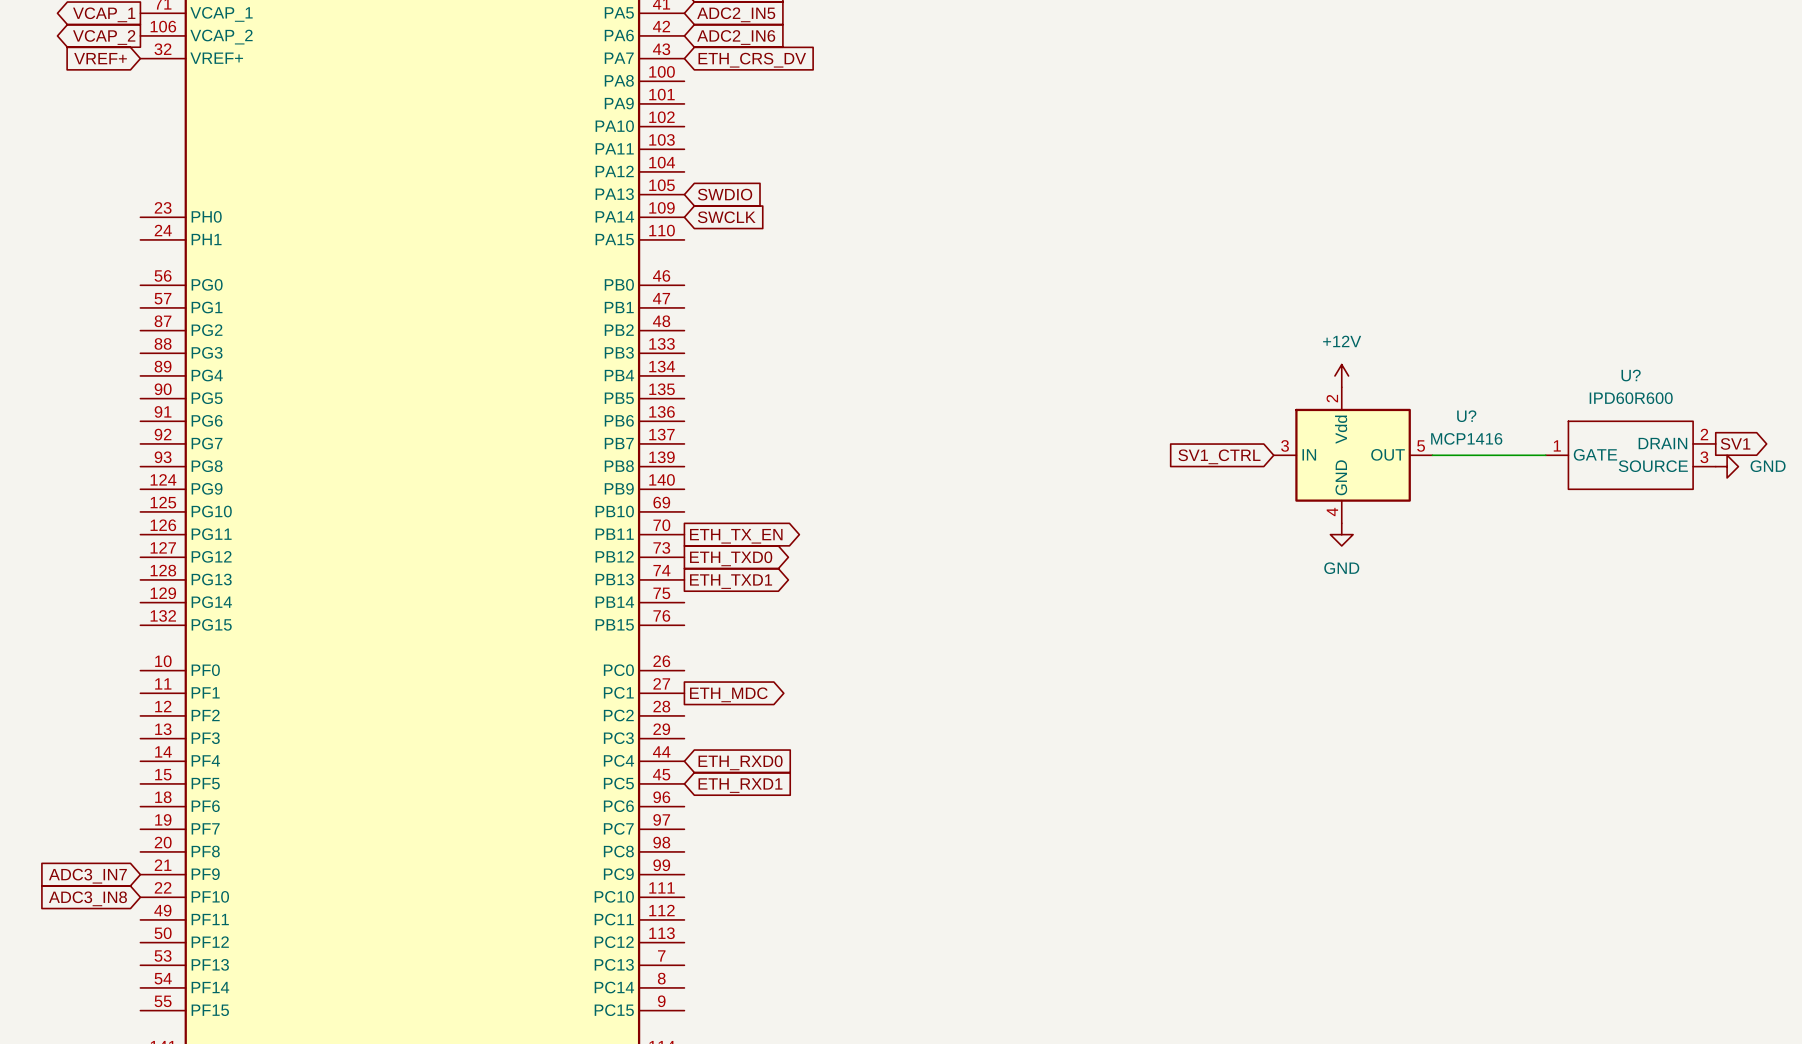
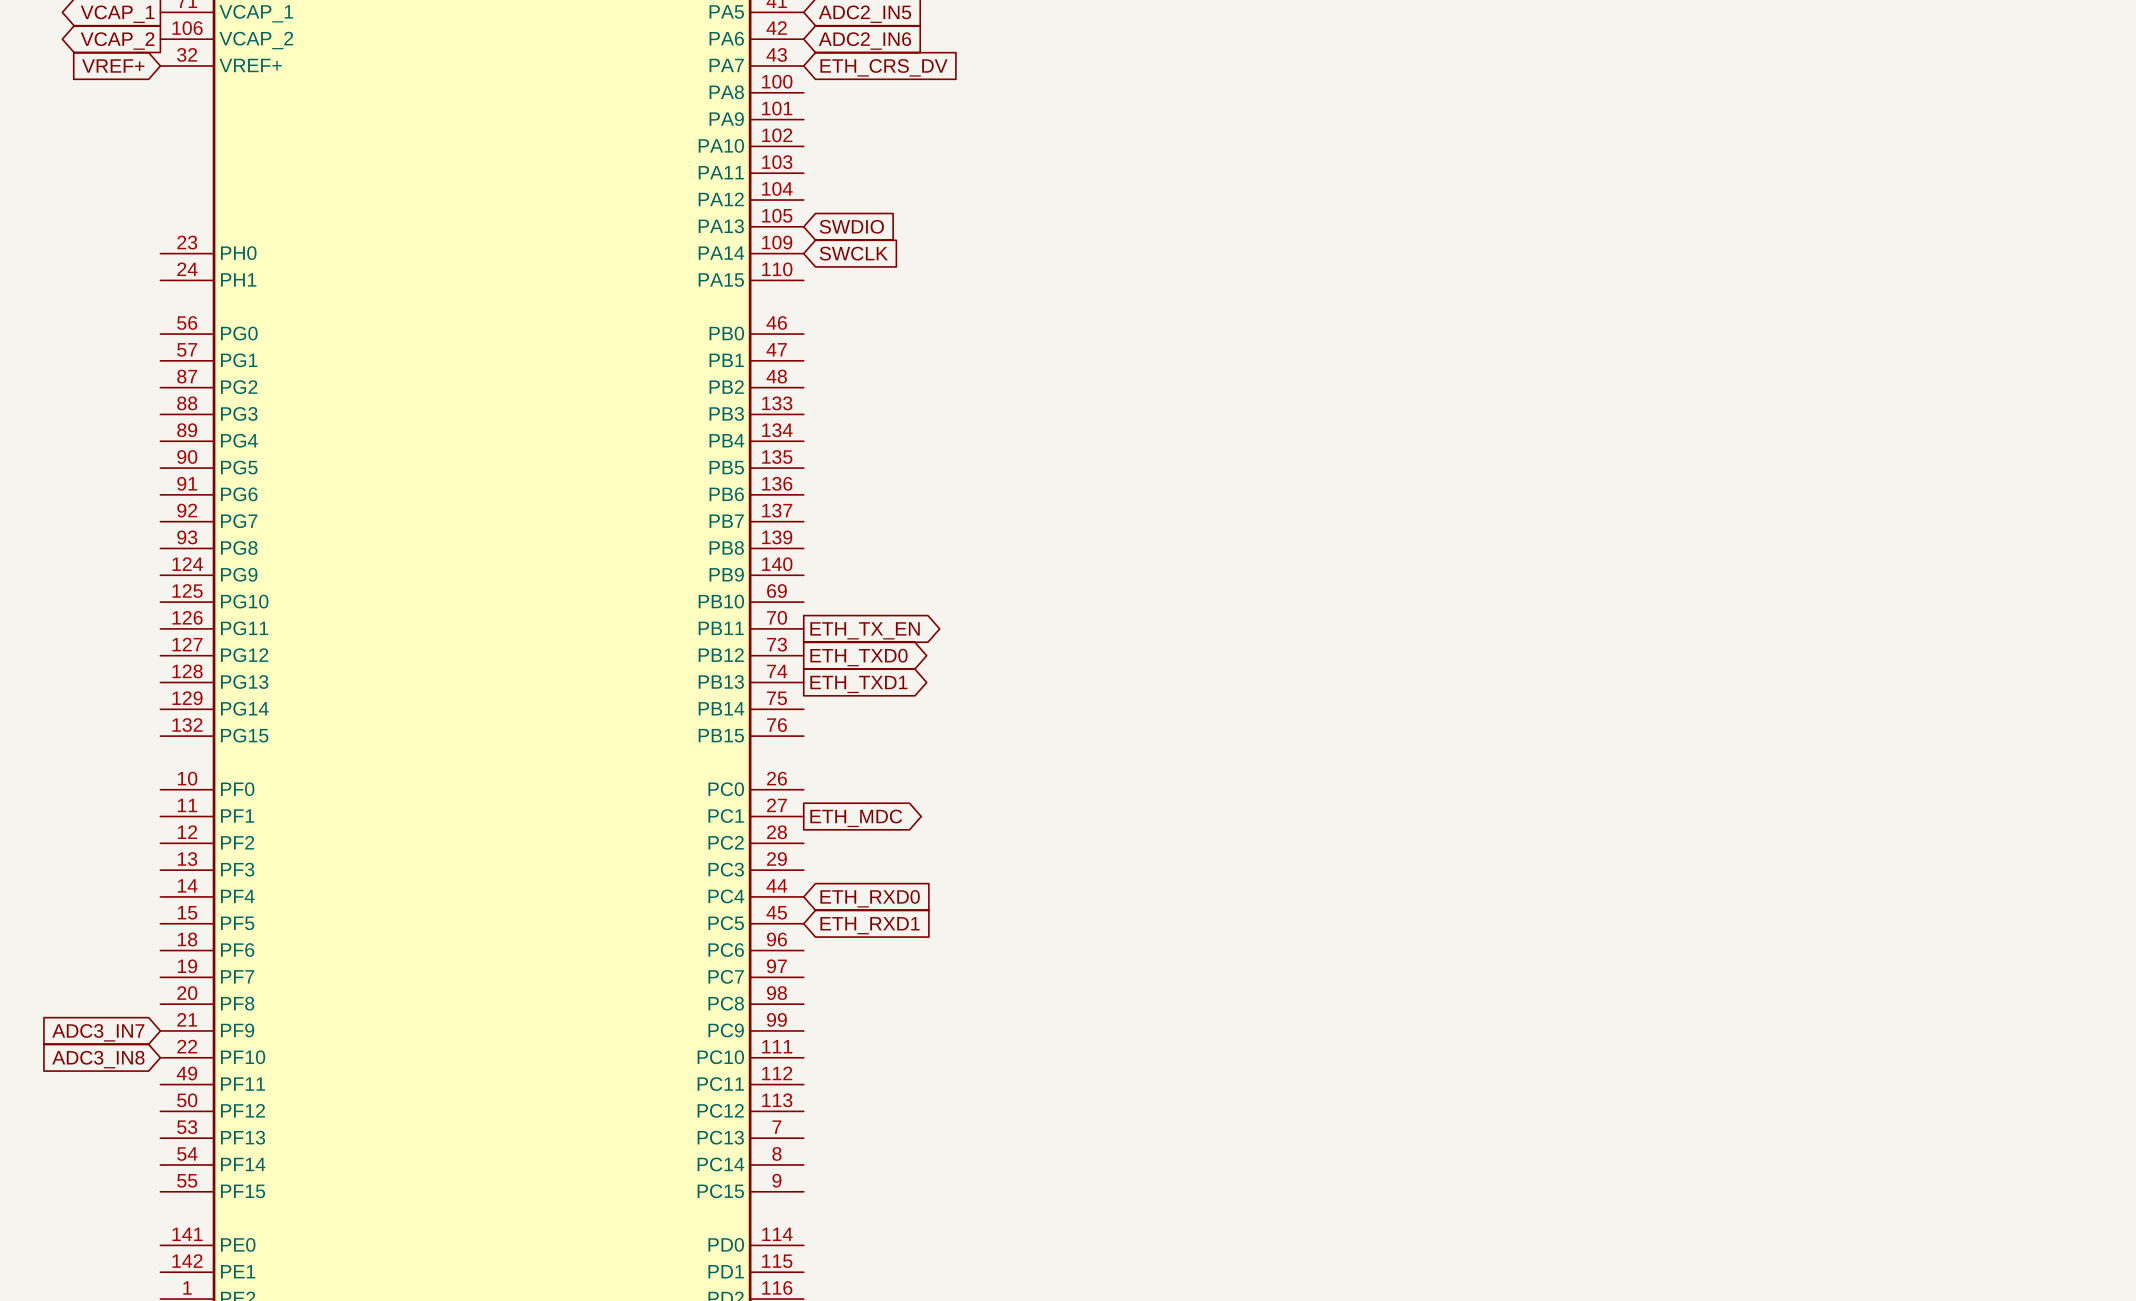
power symbol: +12V (1341, 375) -> none
global label: SV1 (1735, 443) -> none
U?: MCP1416 (1353, 455) -> none
wire: (1432, 455) (1545, 455) -> none
U?: IPD60R600 (1630, 455) -> none
global label: SV1_CTRL (1219, 456) -> none
power symbol: GND (1727, 466) -> none
power symbol: GND (1341, 534) -> none

